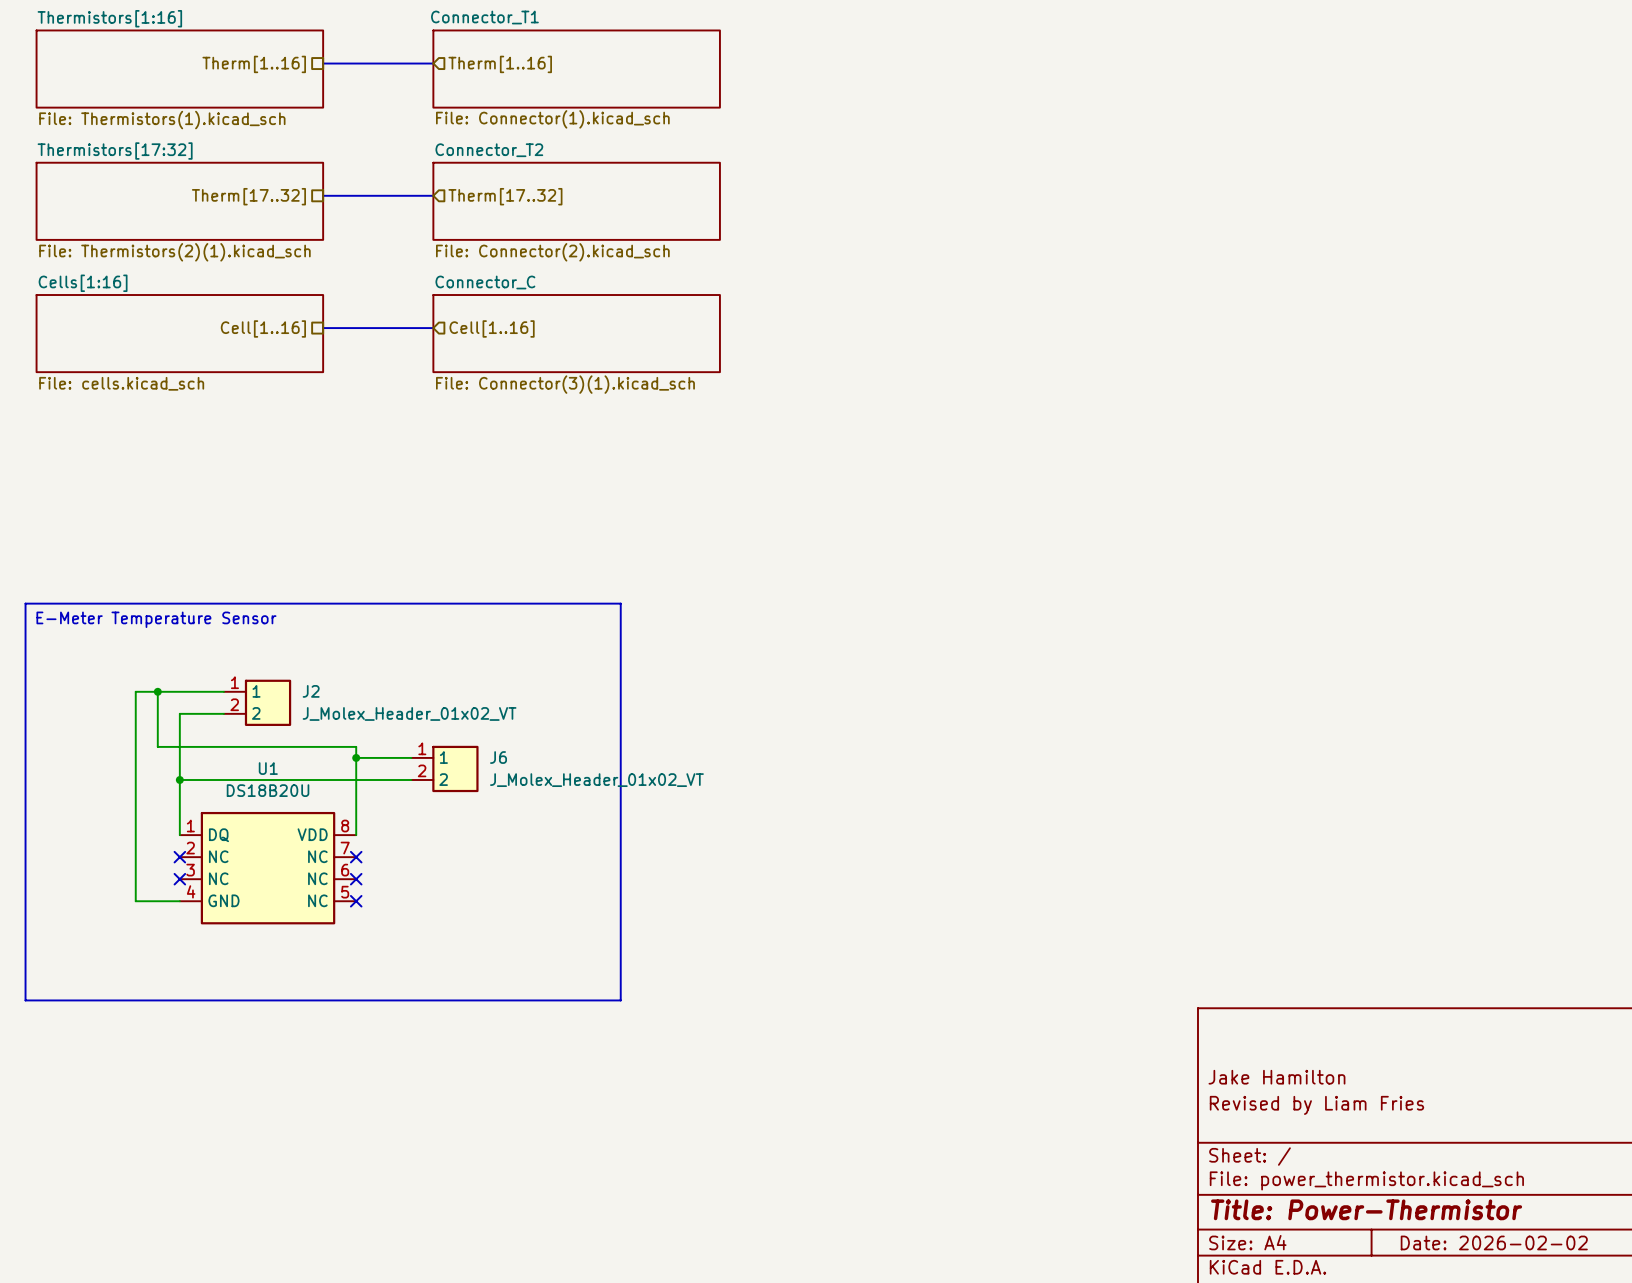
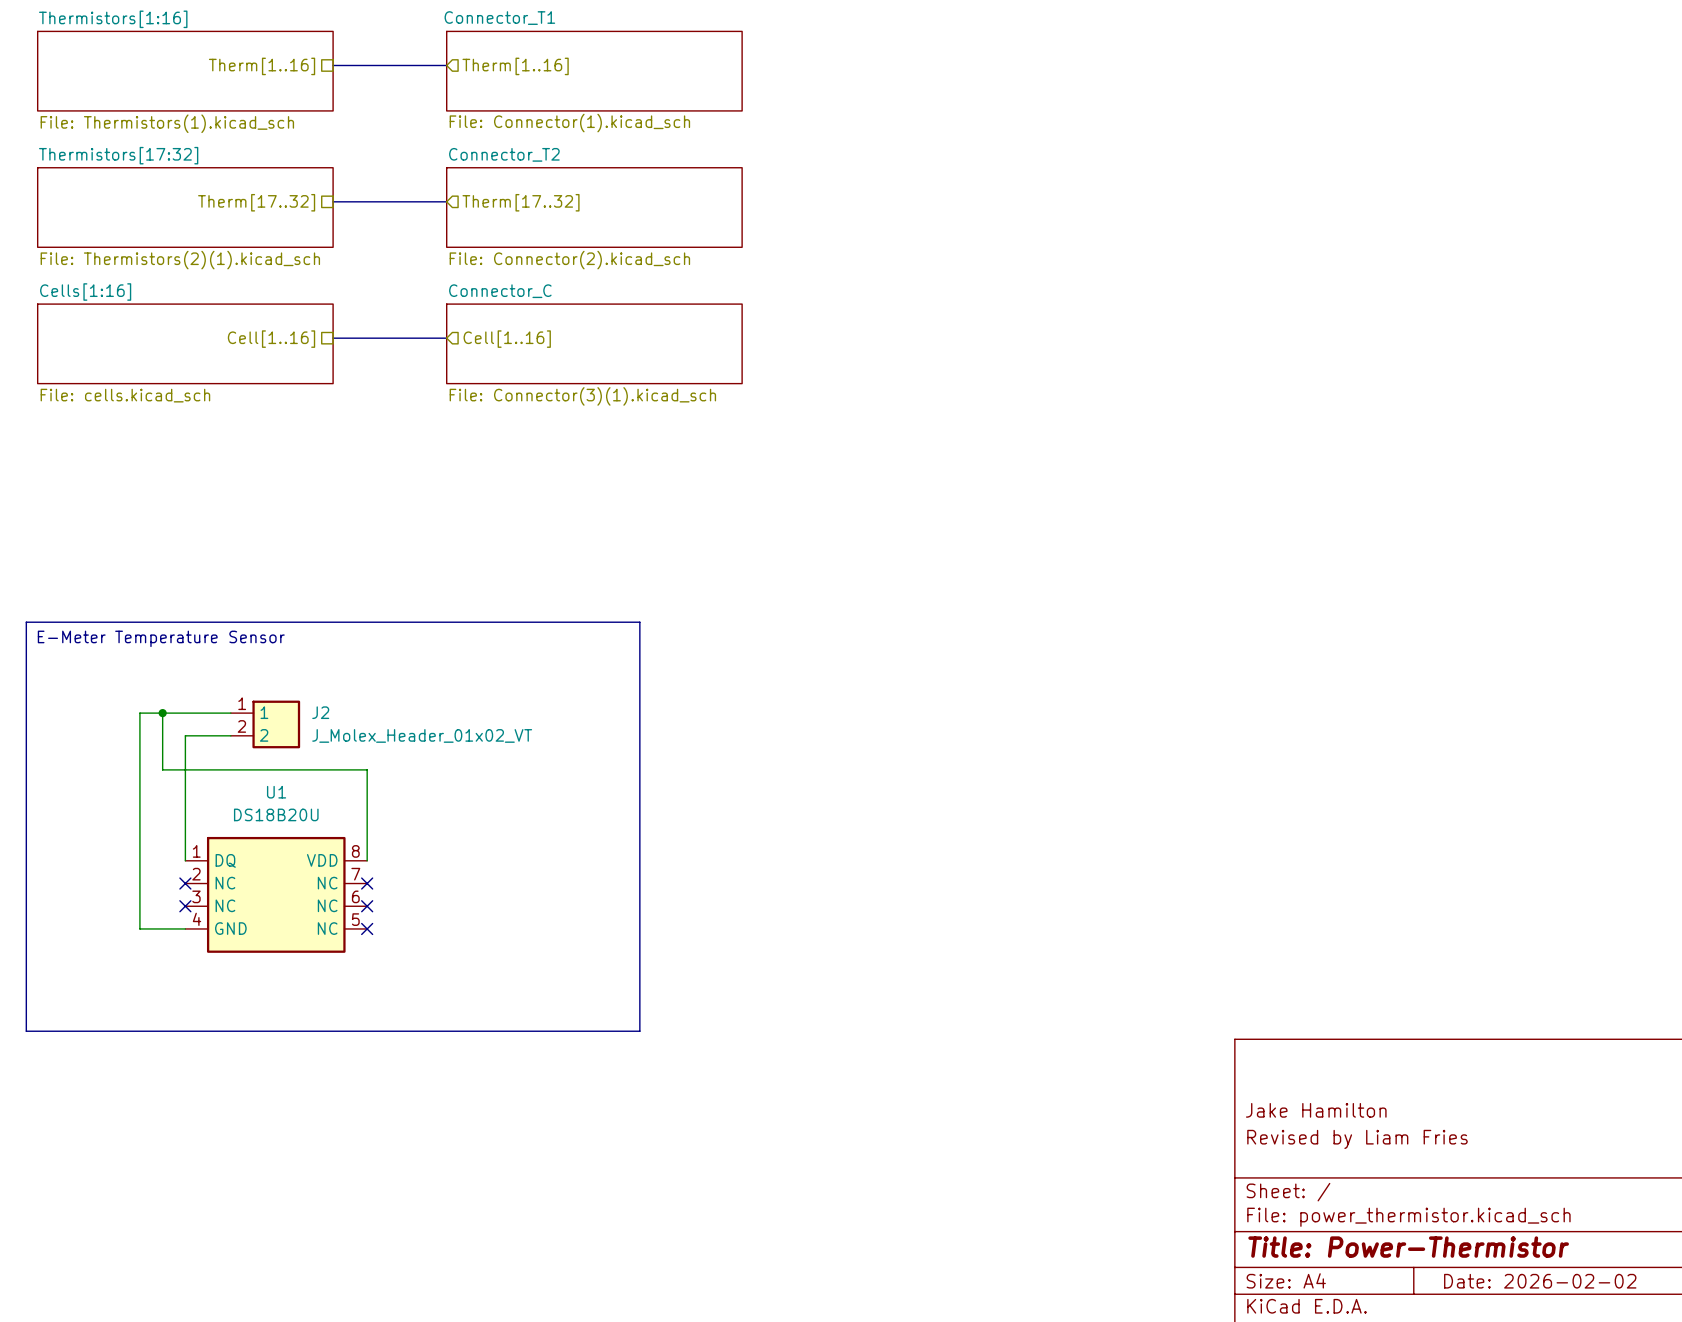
wire: (356, 757) (411, 757) -> none
junction: (356, 757) -> none
J6: J_Molex_Header_01x02_VT (444, 768) -> none
wire: (179, 779) (411, 779) -> none
junction: (179, 779) -> none

